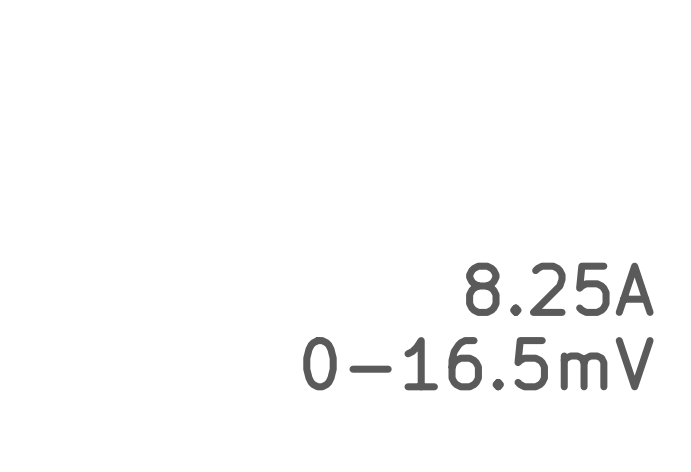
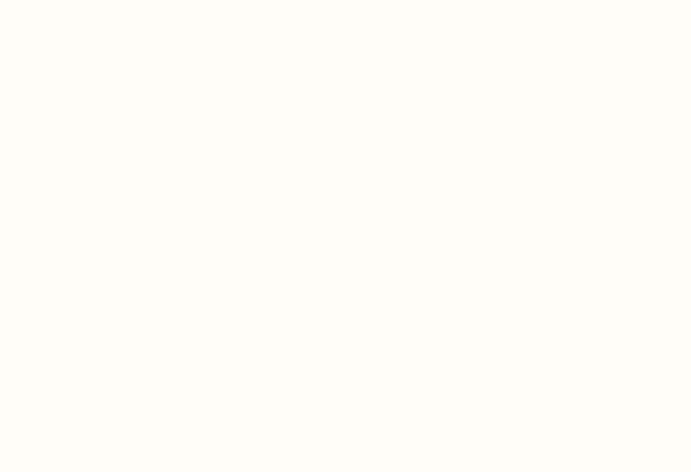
text: 8.25A (559, 289) -> none
text: 0-16.5mV (478, 363) -> none

